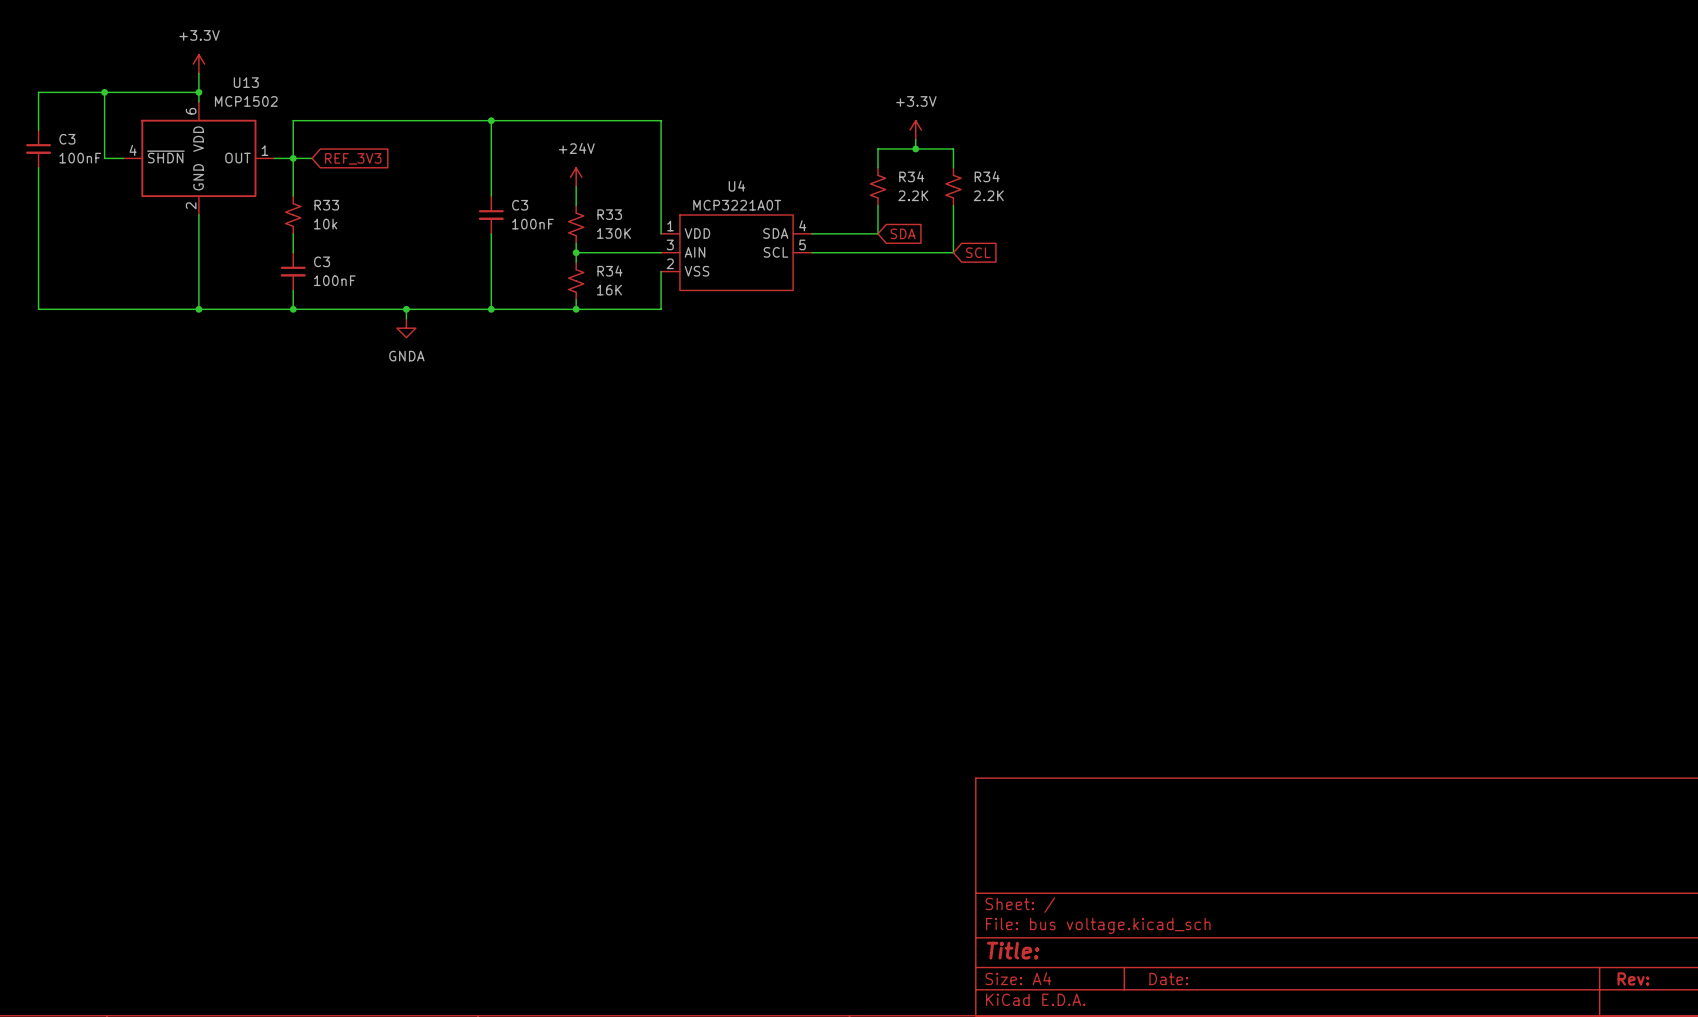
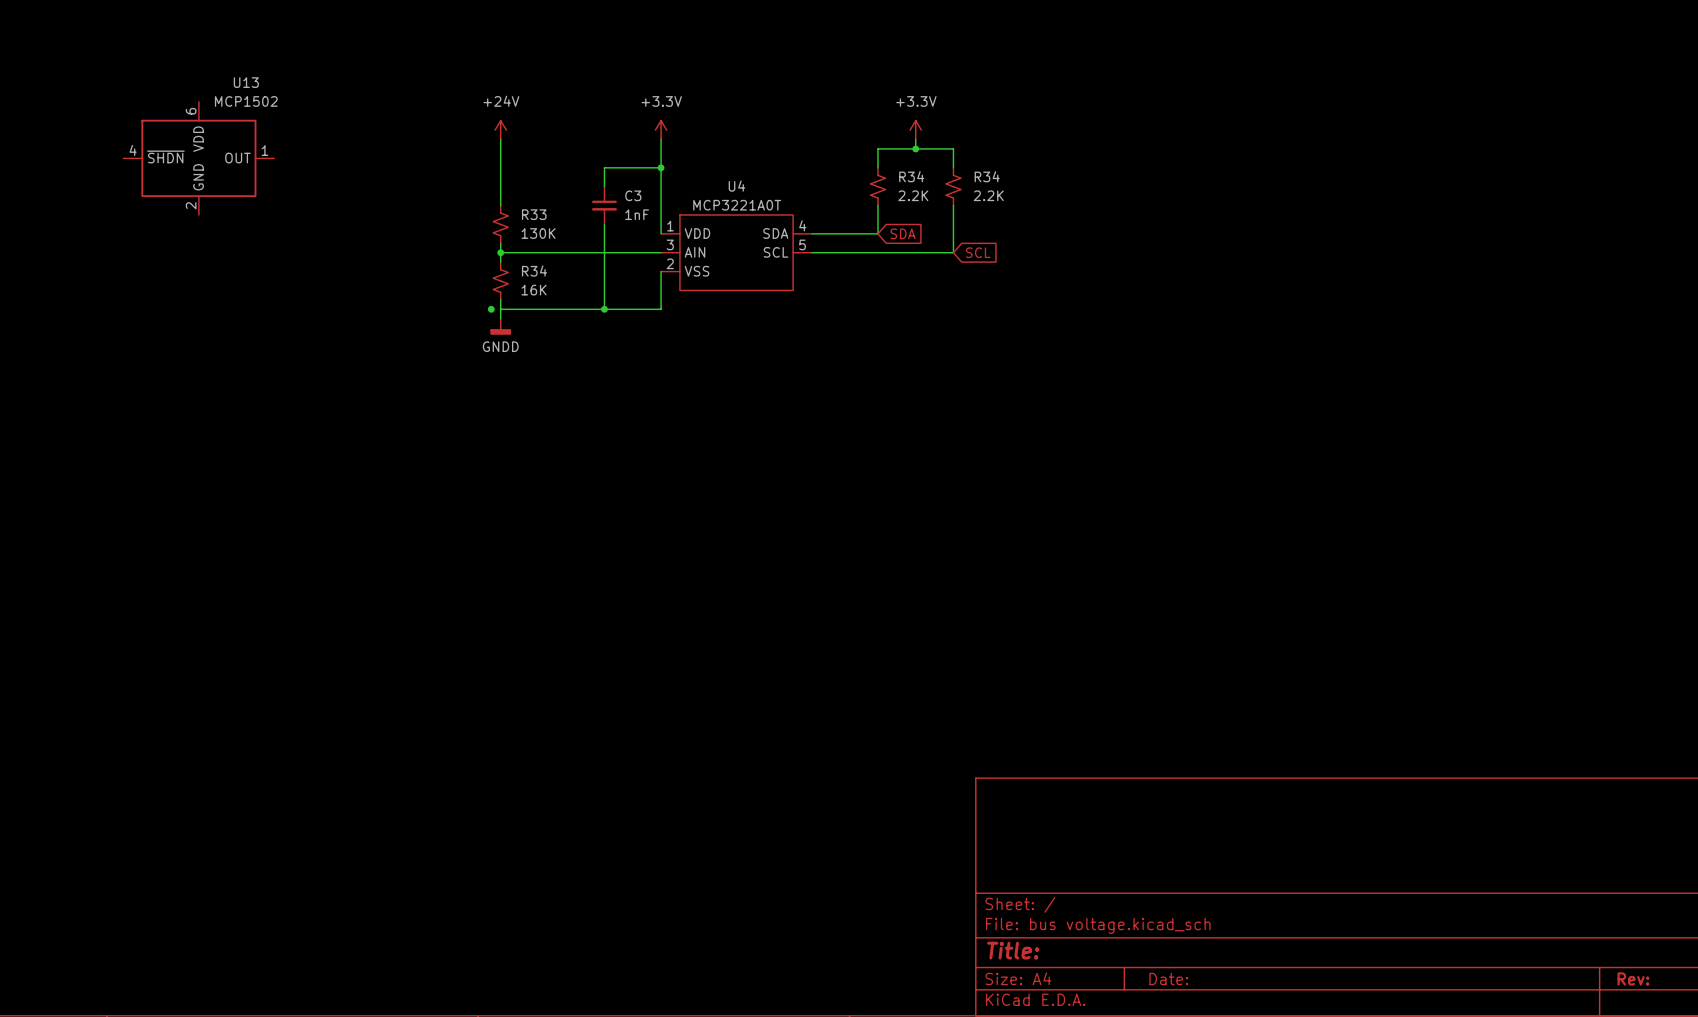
power symbol: +3.3V (198, 64) -> none
wire: (198, 73) (198, 101) -> none
wire: (104, 92) (104, 158) (123, 158) -> none
junction: (104, 92) -> none
wire: (198, 92) (38, 92) (38, 130) -> none
junction: (198, 92) -> none
wire: (491, 120) (491, 196) -> none
junction: (491, 120) -> none
power symbol: none -> +3.3V (661, 130)
wire: none -> (500, 139) (500, 205)
wire: (661, 139) (661, 120) (293, 120) (293, 196) -> none
C3: 100nF (38, 148) -> none
wire: (274, 158) (312, 158) -> none
junction: (293, 158) -> none
global label: REF_3V3 (353, 158) -> none
wire: (38, 167) (38, 309) (500, 309) -> none
wire: none -> (661, 167) (604, 167) (604, 186)
junction: none -> (661, 167)
power symbol position: +24V (576, 177) -> +24V (500, 130)
wire: (576, 186) (576, 205) -> (500, 243) (500, 262)
C3: none -> 1nF (604, 205)
wire: (198, 214) (198, 309) -> none
R33: 10k (293, 214) -> none
C3: 100nF (491, 214) -> none
R33 position: (576, 224) -> (500, 224)
wire: none -> (604, 224) (604, 309)
wire: (293, 233) (293, 252) -> none
wire: (491, 233) (491, 309) -> none
wire: (576, 243) (576, 262) -> (500, 299) (500, 318)
wire: none -> (500, 252) (576, 252)
junction: none -> (500, 252)
junction: (576, 252) -> none
C3: 100nF (293, 271) -> none
R34 position: (576, 281) -> (500, 281)
wire: (293, 290) (293, 309) -> none
wire: (576, 299) (576, 309) -> none
junction: (198, 309) -> none
junction: (293, 309) -> none
wire: (406, 309) (406, 318) -> none
junction: (406, 309) -> none
junction position: (576, 309) -> (604, 309)
power symbol: none -> GNDD (500, 326)
power symbol: GNDA (406, 328) -> none

